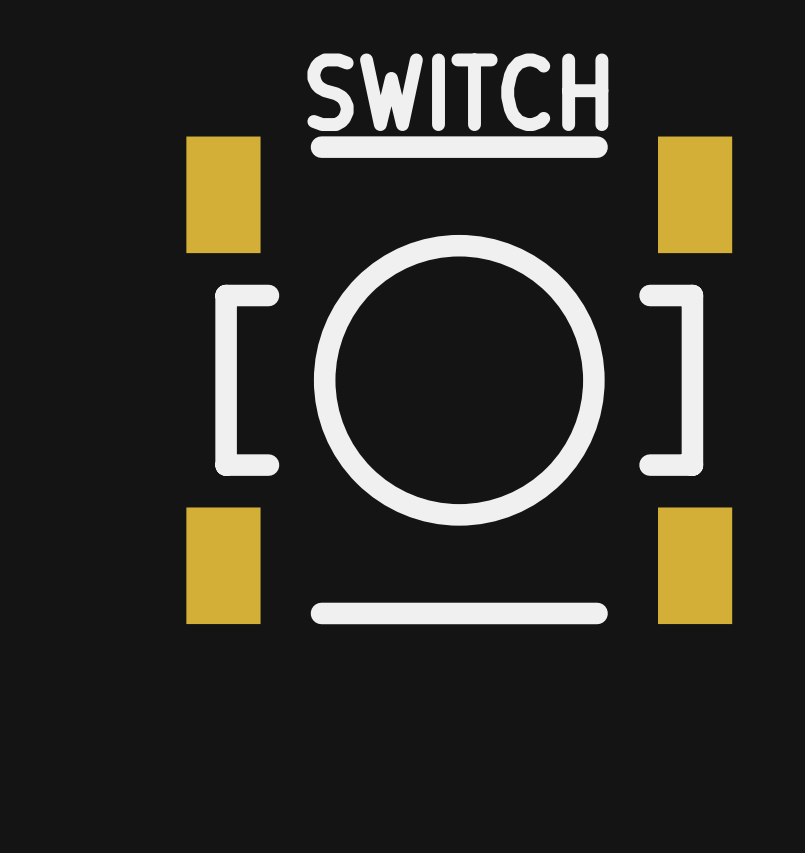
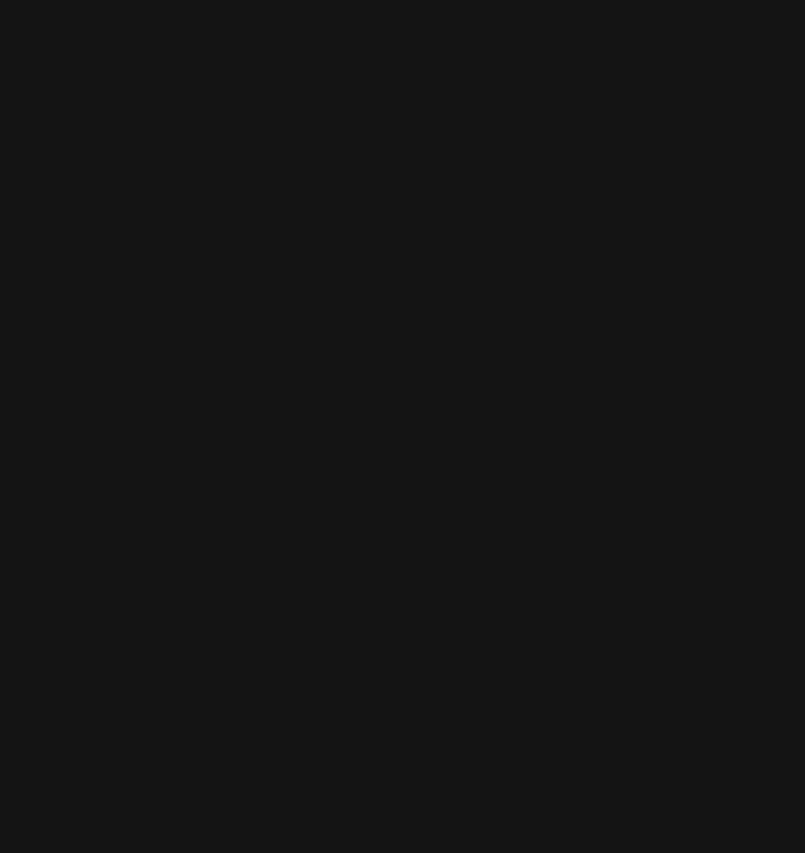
SWITCH: (459, 380) -> none

